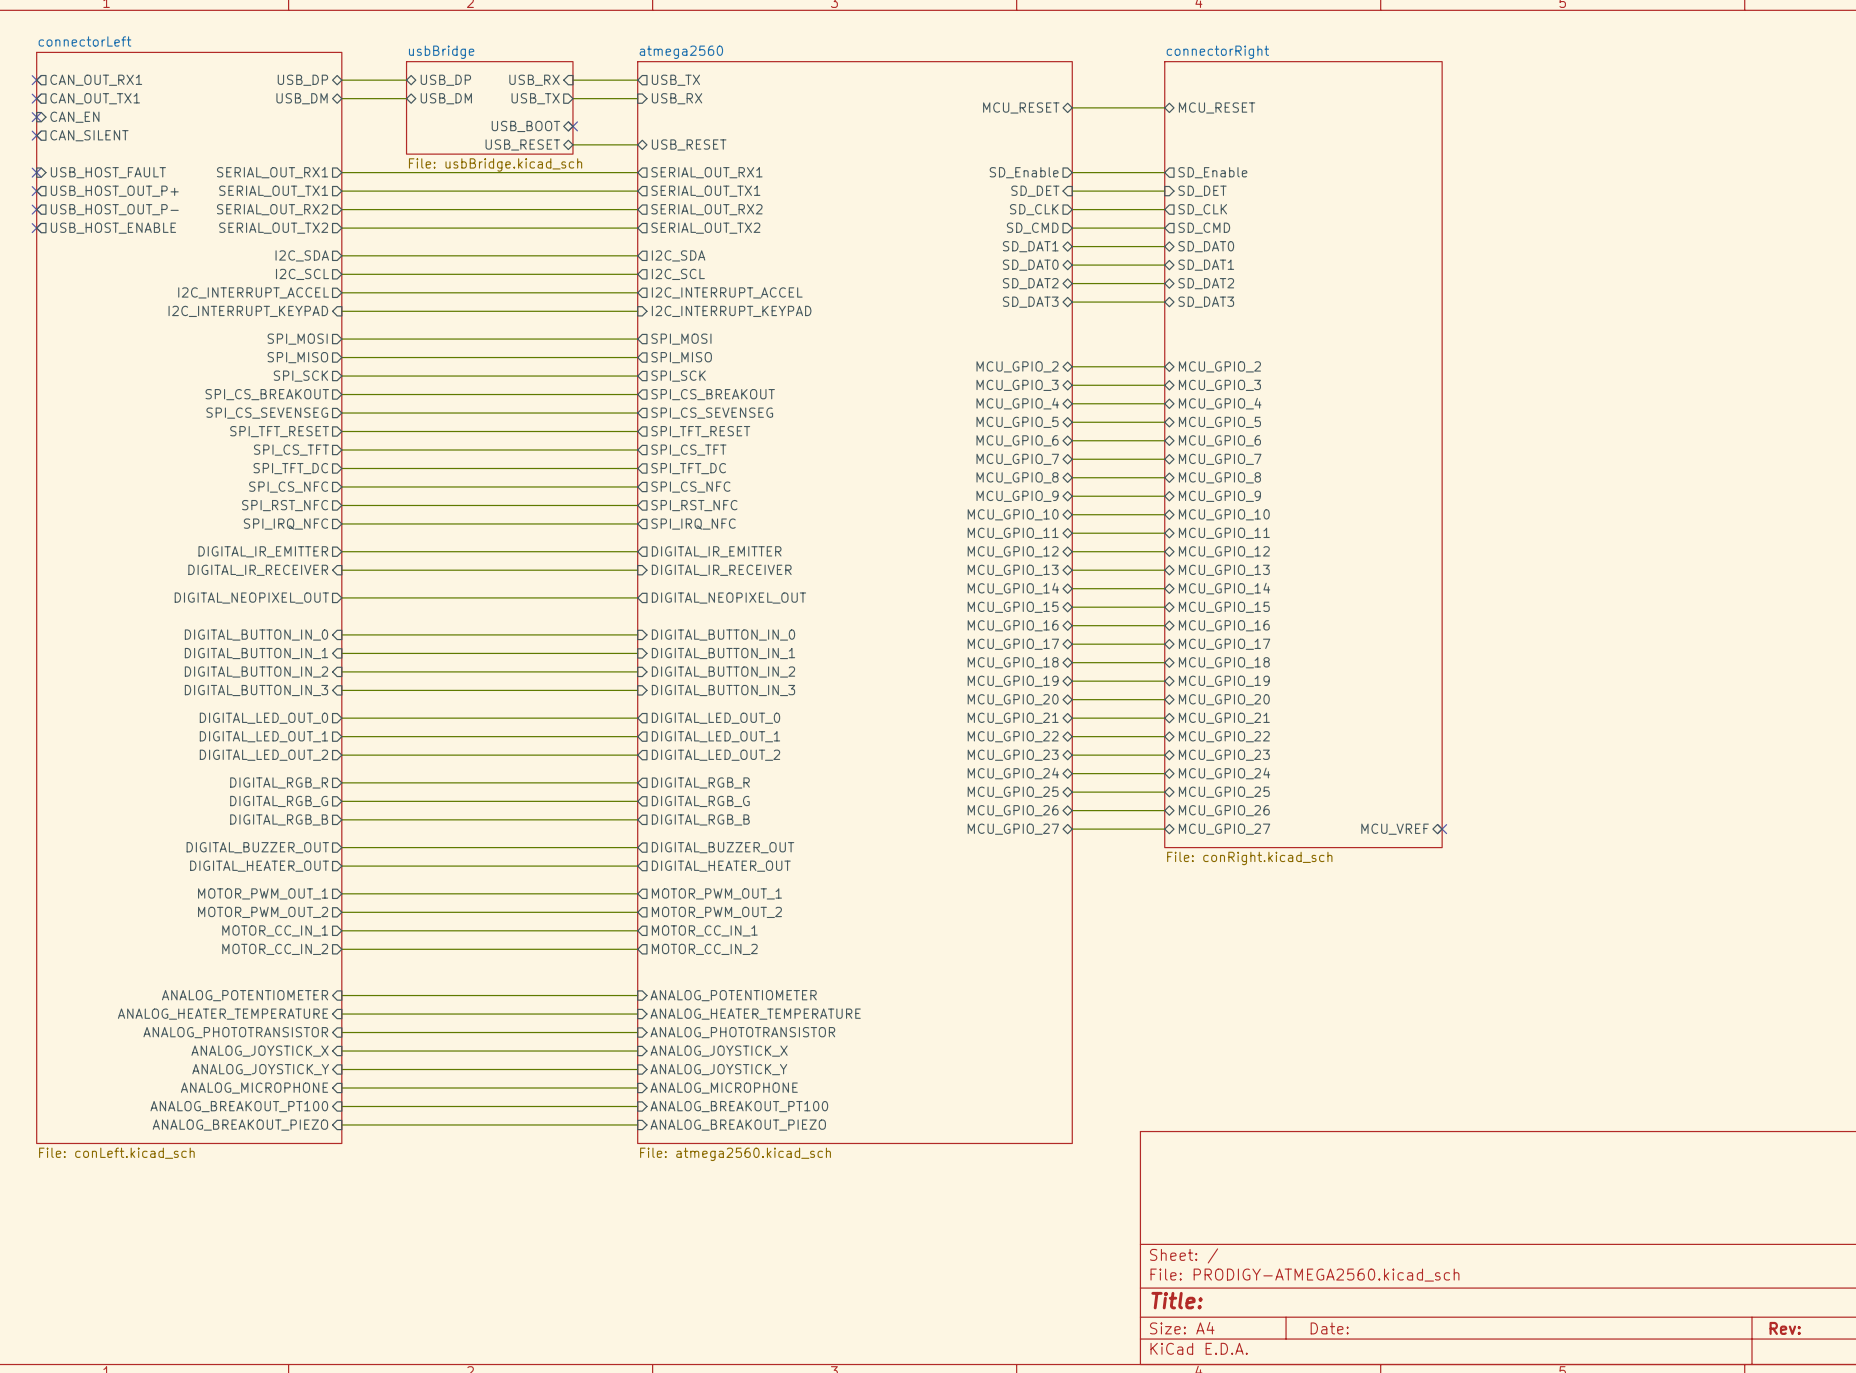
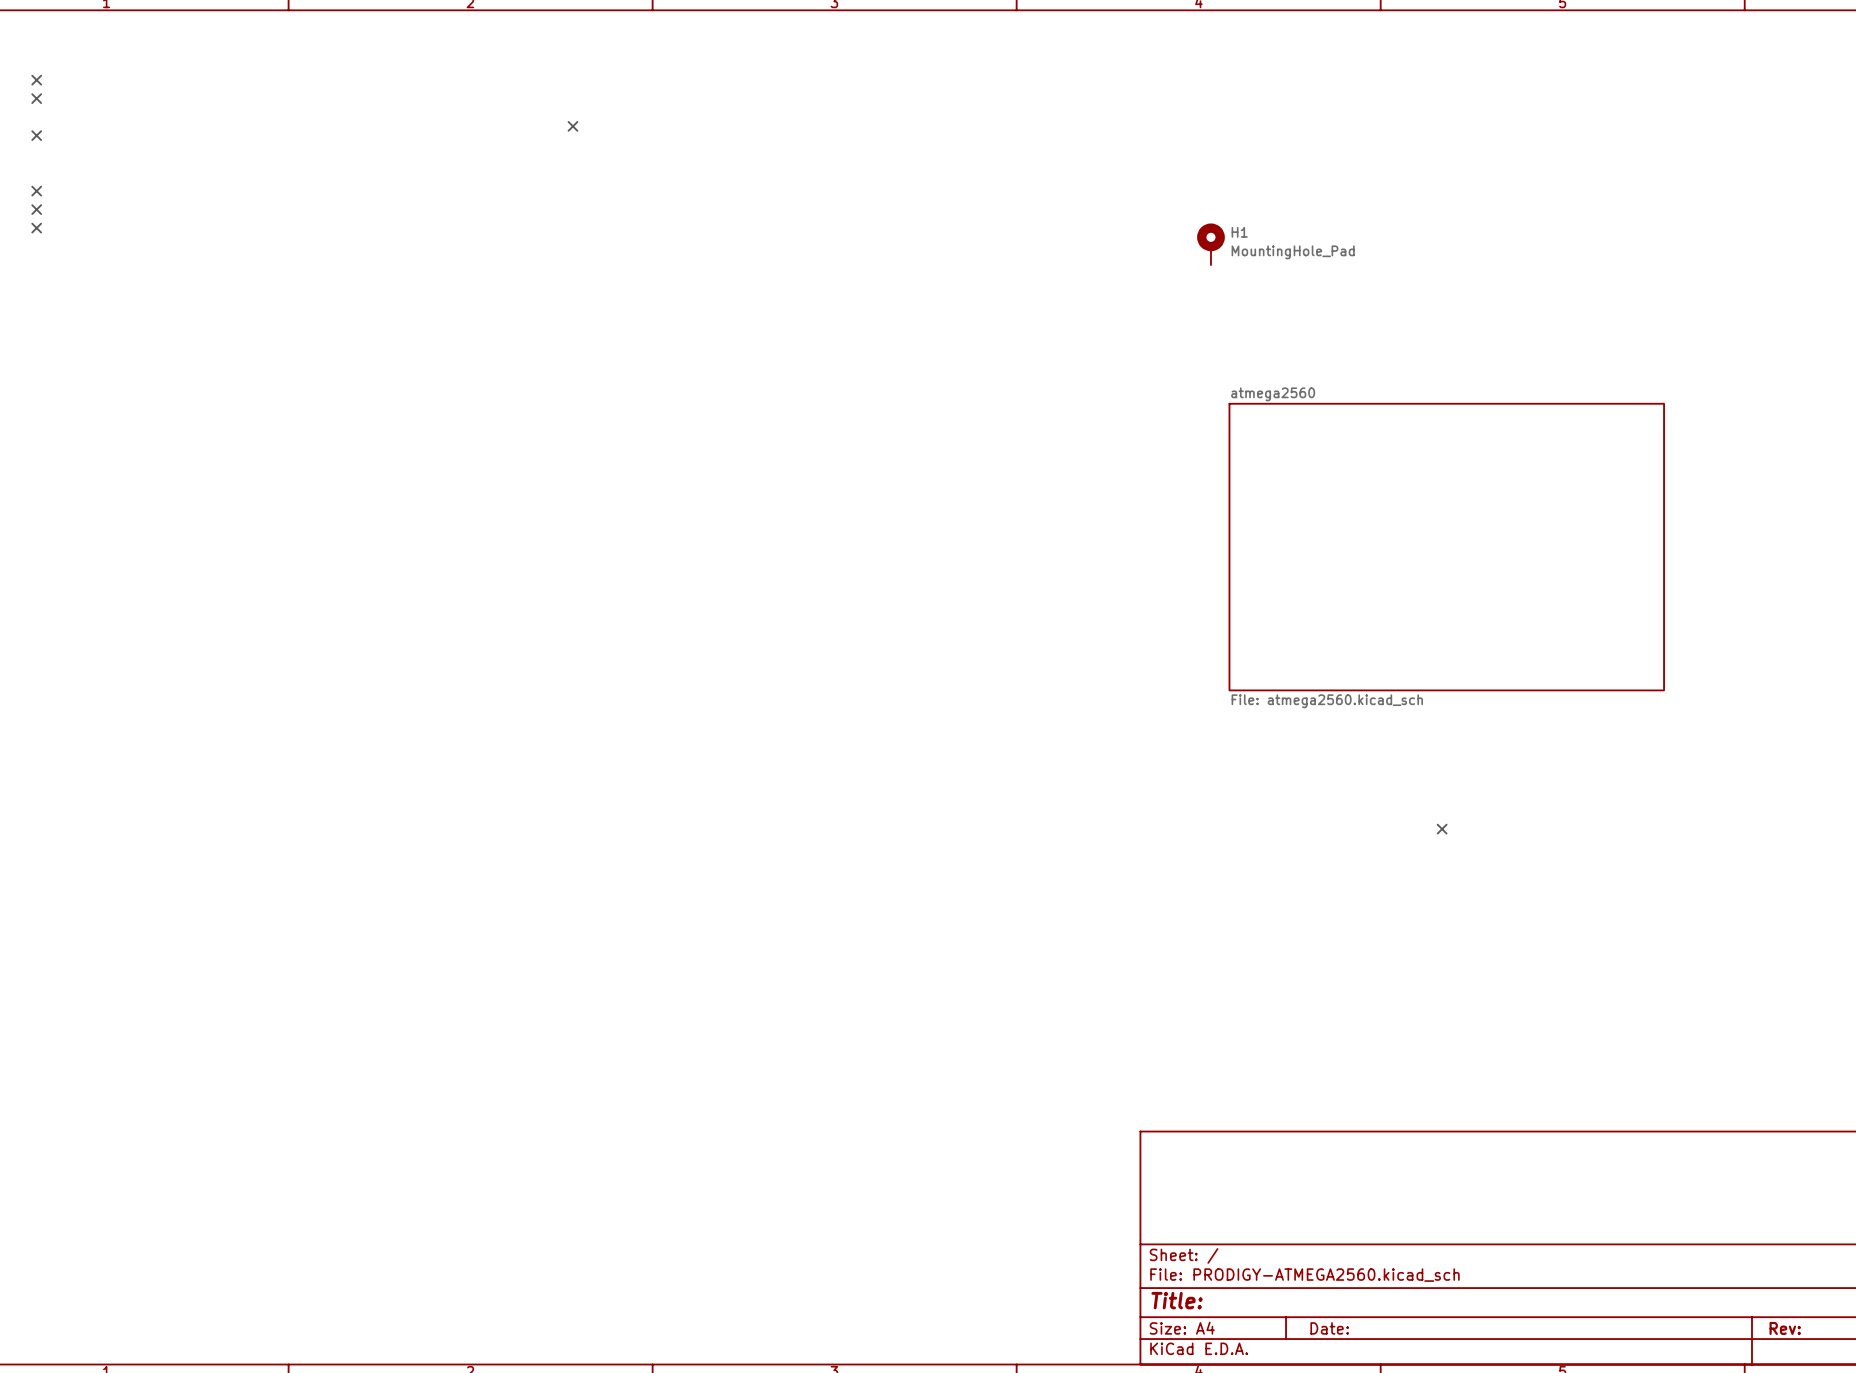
sheet atmega2560 name position: atmega2560 (681, 52) -> atmega2560 (1273, 394)
sheet atmega2560 shape: [637, 61, 1073, 1145] -> [1228, 403, 1665, 691]
sheet pin: CAN_OUT_RX1 (96, 80) -> none
sheet pin: USB_DP (302, 80) -> none
wire: (341, 80) (406, 80) -> none
sheet pin: USB_DP (445, 80) -> none
sheet pin: USB_RX (534, 80) -> none
wire: (572, 80) (637, 80) -> none
sheet pin: USB_TX (675, 80) -> none
sheet pin: CAN_OUT_TX1 (95, 98) -> none
sheet pin: USB_DM (302, 98) -> none
wire: (341, 98) (406, 98) -> none
sheet pin: USB_DM (446, 98) -> none
sheet pin: USB_TX (535, 98) -> none
wire: (572, 98) (637, 98) -> none
sheet pin: USB_RX (677, 98) -> none
sheet usbBridge: File: usbBridge.kicad_sch (489, 107) -> none
sheet pin: MCU_RESET (1021, 107) -> none
wire: (1072, 107) (1164, 107) -> none
sheet pin: MCU_RESET (1217, 107) -> none
no-connect mark: (36, 117) -> none
sheet pin: CAN_EN (74, 117) -> none
sheet pin: USB_BOOT (525, 126) -> none
sheet pin: CAN_SILENT (89, 135) -> none
sheet pin: USB_RESET (522, 144) -> none
wire: (572, 144) (637, 144) -> none
sheet pin: USB_RESET (689, 144) -> none
no-connect mark: (36, 172) -> none
sheet pin: USB_HOST_FAULT (108, 172) -> none
sheet pin: SERIAL_OUT_RX1 (272, 172) -> none
wire: (341, 172) (637, 172) -> none
sheet pin: SERIAL_OUT_RX1 (706, 172) -> none
sheet pin: SD_Enable (1024, 172) -> none
wire: (1072, 172) (1164, 172) -> none
sheet pin: SD_Enable (1212, 172) -> none
sheet pin: USB_HOST_OUT_P+ (114, 191) -> none
sheet pin: SERIAL_OUT_TX1 (273, 191) -> none
wire: (341, 191) (637, 191) -> none
sheet pin: SERIAL_OUT_TX1 (705, 191) -> none
sheet pin: SD_DET (1035, 191) -> none
wire: (1072, 191) (1164, 191) -> none
sheet pin: SD_DET (1202, 191) -> none
sheet pin: USB_HOST_OUT_P- (114, 209) -> none
sheet pin: SERIAL_OUT_RX2 (272, 209) -> none
wire: (341, 209) (637, 209) -> none
sheet pin: SERIAL_OUT_RX2 (706, 209) -> none
sheet pin: SD_CLK (1034, 209) -> none
wire: (1072, 209) (1164, 209) -> none
sheet pin: SD_CLK (1202, 209) -> none
sheet pin: USB_HOST_ENABLE (113, 228) -> none
sheet pin: SERIAL_OUT_TX2 (273, 228) -> none
wire: (341, 228) (637, 228) -> none
sheet pin: SERIAL_OUT_TX2 (705, 228) -> none
sheet pin: SD_CMD (1032, 228) -> none
wire: (1072, 228) (1164, 228) -> none
sheet pin: SD_CMD (1204, 228) -> none
H1: none -> MountingHole_Pad (1210, 244)
sheet pin: SD_DAT1 (1030, 246) -> none
wire: (1072, 246) (1164, 246) -> none
sheet pin: SD_DAT0 (1206, 246) -> none
sheet pin: I2C_SDA (302, 255) -> none
wire: (341, 255) (637, 255) -> none
sheet pin: I2C_SDA (678, 255) -> none
sheet pin: SD_DAT0 (1030, 265) -> none
wire: (1072, 265) (1164, 265) -> none
sheet pin: SD_DAT1 (1206, 265) -> none
sheet pin: I2C_SCL (302, 274) -> none
wire: (341, 274) (637, 274) -> none
sheet pin: I2C_SCL (678, 274) -> none
sheet pin: SD_DAT2 (1030, 283) -> none
wire: (1072, 283) (1164, 283) -> none
sheet pin: SD_DAT2 (1206, 283) -> none
sheet pin: I2C_INTERRUPT_ACCEL (253, 292) -> none
wire: (341, 292) (637, 292) -> none
sheet pin: I2C_INTERRUPT_ACCEL (727, 292) -> none
sheet pin: SD_DAT3 (1030, 302) -> none
wire: (1072, 302) (1164, 302) -> none
sheet pin: SD_DAT3 (1206, 302) -> none
sheet pin: I2C_INTERRUPT_KEYPAD (248, 311) -> none
wire: (341, 311) (637, 311) -> none
sheet pin: I2C_INTERRUPT_KEYPAD (731, 311) -> none
sheet pin: SPI_MOSI (297, 339) -> none
wire: (341, 339) (637, 339) -> none
sheet pin: SPI_MOSI (681, 339) -> none
sheet pin: SPI_MISO (297, 357) -> none
wire: (341, 357) (637, 357) -> none
sheet pin: SPI_MISO (681, 357) -> none
sheet pin: MCU_GPIO_2 (1017, 366) -> none
wire: (1072, 366) (1164, 366) -> none
sheet pin: MCU_GPIO_2 (1219, 366) -> none
sheet pin: SPI_SCK (300, 376) -> none
wire: (341, 376) (637, 376) -> none
sheet pin: SPI_SCK (678, 376) -> none
sheet pin: MCU_GPIO_3 (1017, 385) -> none
wire: (1072, 385) (1164, 385) -> none
sheet pin: MCU_GPIO_3 (1219, 385) -> none
sheet pin: SPI_CS_BREAKOUT (267, 394) -> none
wire: (341, 394) (637, 394) -> none
sheet pin: SPI_CS_BREAKOUT (713, 394) -> none
sheet pin: MCU_GPIO_4 (1017, 403) -> none
wire: (1072, 403) (1164, 403) -> none
sheet pin: MCU_GPIO_4 (1220, 403) -> none
sheet pin: SPI_CS_SEVENSEG (267, 413) -> none
wire: (341, 413) (637, 413) -> none
sheet pin: SPI_CS_SEVENSEG (712, 413) -> none
sheet pin: MCU_GPIO_5 (1017, 422) -> none
wire: (1072, 422) (1164, 422) -> none
sheet pin: MCU_GPIO_5 (1219, 422) -> none
sheet pin: SPI_TFT_RESET (279, 431) -> none
wire: (341, 431) (637, 431) -> none
sheet pin: SPI_TFT_RESET (700, 431) -> none
sheet pin: MCU_GPIO_6 (1017, 440) -> none
wire: (1072, 440) (1164, 440) -> none
sheet pin: MCU_GPIO_6 (1219, 440) -> none
sheet pin: SPI_CS_TFT (291, 450) -> none
wire: (341, 450) (637, 450) -> none
sheet pin: SPI_CS_TFT (688, 450) -> none
sheet connectorRight: File: conRight.kicad_sch (1303, 454) -> none
sheet pin: MCU_GPIO_7 (1017, 459) -> none
wire: (1072, 459) (1164, 459) -> none
sheet pin: MCU_GPIO_7 (1220, 459) -> none
sheet pin: SPI_TFT_DC (290, 468) -> none
wire: (341, 468) (637, 468) -> none
sheet pin: SPI_TFT_DC (688, 468) -> none
sheet pin: MCU_GPIO_8 (1017, 477) -> none
wire: (1072, 477) (1164, 477) -> none
sheet pin: MCU_GPIO_8 (1219, 477) -> none
wire: (341, 486) (637, 486) -> none
sheet pin: SPI_CS_NFC (288, 487) -> none
sheet pin: SPI_CS_NFC (690, 487) -> none
sheet pin: MCU_GPIO_9 (1017, 496) -> none
wire: (1072, 496) (1164, 496) -> none
sheet pin: MCU_GPIO_9 (1219, 496) -> none
sheet pin: SPI_RST_NFC (285, 505) -> none
wire: (341, 505) (637, 505) -> none
sheet pin: SPI_RST_NFC (694, 505) -> none
sheet pin: MCU_GPIO_10 (1013, 514) -> none
wire: (1072, 514) (1164, 514) -> none
sheet pin: MCU_GPIO_10 (1224, 514) -> none
wire: (341, 523) (637, 523) -> none
sheet pin: SPI_IRQ_NFC (285, 524) -> none
sheet pin: SPI_IRQ_NFC (693, 524) -> none
sheet pin: MCU_GPIO_11 (1013, 533) -> none
wire: (1072, 533) (1164, 533) -> none
sheet pin: MCU_GPIO_11 (1224, 533) -> none
sheet pin: DIGITAL_IR_EMITTER (263, 551) -> none
wire: (341, 551) (637, 551) -> none
sheet pin: DIGITAL_IR_EMITTER (716, 551) -> none
sheet pin: MCU_GPIO_12 (1013, 551) -> none
wire: (1072, 551) (1164, 551) -> none
sheet pin: MCU_GPIO_12 (1224, 551) -> none
sheet pin: DIGITAL_IR_RECEIVER (258, 570) -> none
wire: (341, 570) (637, 570) -> none
sheet pin: DIGITAL_IR_RECEIVER (721, 570) -> none
sheet pin: MCU_GPIO_13 (1013, 570) -> none
wire: (1072, 570) (1164, 570) -> none
sheet pin: MCU_GPIO_13 (1224, 570) -> none
sheet pin: MCU_GPIO_14 (1013, 588) -> none
wire: (1072, 588) (1164, 588) -> none
sheet pin: MCU_GPIO_14 (1224, 588) -> none
sheet connectorLeft: File: conLeft.kicad_sch (189, 597) -> none
wire: (341, 597) (637, 597) -> none
sheet pin: DIGITAL_NEOPIXEL_OUT (251, 598) -> none
sheet pin: DIGITAL_NEOPIXEL_OUT (728, 598) -> none
sheet pin: MCU_GPIO_15 (1013, 607) -> none
wire: (1072, 607) (1164, 607) -> none
sheet pin: MCU_GPIO_15 (1224, 607) -> none
sheet pin: MCU_GPIO_16 (1013, 625) -> none
wire: (1072, 625) (1164, 625) -> none
sheet pin: MCU_GPIO_16 (1224, 625) -> none
wire: (341, 634) (637, 634) -> none
sheet pin: DIGITAL_BUTTON_IN_0 (256, 635) -> none
sheet pin: DIGITAL_BUTTON_IN_0 (723, 635) -> none
sheet pin: MCU_GPIO_17 (1013, 644) -> none
wire: (1072, 644) (1164, 644) -> none
sheet pin: MCU_GPIO_17 (1224, 644) -> none
sheet pin: DIGITAL_BUTTON_IN_1 (256, 653) -> none
wire: (341, 653) (637, 653) -> none
sheet pin: DIGITAL_BUTTON_IN_1 (723, 653) -> none
sheet pin: MCU_GPIO_18 (1013, 662) -> none
wire: (1072, 662) (1164, 662) -> none
sheet pin: MCU_GPIO_18 (1224, 662) -> none
wire: (341, 671) (637, 671) -> none
sheet pin: DIGITAL_BUTTON_IN_2 (256, 672) -> none
sheet pin: DIGITAL_BUTTON_IN_2 (723, 672) -> none
sheet pin: MCU_GPIO_19 (1013, 681) -> none
wire: (1072, 681) (1164, 681) -> none
sheet pin: MCU_GPIO_19 (1224, 681) -> none
sheet pin: DIGITAL_BUTTON_IN_3 (256, 690) -> none
wire: (341, 690) (637, 690) -> none
sheet pin: DIGITAL_BUTTON_IN_3 (723, 690) -> none
sheet pin: MCU_GPIO_20 (1013, 699) -> none
wire: (1072, 699) (1164, 699) -> none
sheet pin: MCU_GPIO_20 (1224, 699) -> none
sheet pin: DIGITAL_LED_OUT_0 (263, 718) -> none
wire: (341, 718) (637, 718) -> none
sheet pin: DIGITAL_LED_OUT_0 (716, 718) -> none
sheet pin: MCU_GPIO_21 (1013, 718) -> none
wire: (1072, 718) (1164, 718) -> none
sheet pin: MCU_GPIO_21 (1224, 718) -> none
sheet pin: DIGITAL_LED_OUT_1 (263, 736) -> none
wire: (341, 736) (637, 736) -> none
sheet pin: DIGITAL_LED_OUT_1 (716, 736) -> none
sheet pin: MCU_GPIO_22 (1013, 736) -> none
wire: (1072, 736) (1164, 736) -> none
sheet pin: MCU_GPIO_22 (1224, 736) -> none
sheet pin: DIGITAL_LED_OUT_2 (263, 755) -> none
wire: (341, 755) (637, 755) -> none
sheet pin: DIGITAL_LED_OUT_2 (716, 755) -> none
sheet pin: MCU_GPIO_23 (1013, 755) -> none
wire: (1072, 755) (1164, 755) -> none
sheet pin: MCU_GPIO_23 (1224, 755) -> none
sheet pin: MCU_GPIO_24 (1013, 773) -> none
wire: (1072, 773) (1164, 773) -> none
sheet pin: MCU_GPIO_24 (1224, 773) -> none
sheet pin: DIGITAL_RGB_R (279, 782) -> none
wire: (341, 782) (637, 782) -> none
sheet pin: DIGITAL_RGB_R (700, 782) -> none
sheet pin: MCU_GPIO_25 (1013, 792) -> none
wire: (1072, 792) (1164, 792) -> none
sheet pin: MCU_GPIO_25 (1224, 792) -> none
sheet pin: DIGITAL_RGB_G (279, 801) -> none
wire: (341, 801) (637, 801) -> none
sheet pin: DIGITAL_RGB_G (700, 801) -> none
sheet pin: MCU_GPIO_26 (1013, 810) -> none
wire: (1072, 810) (1164, 810) -> none
sheet pin: MCU_GPIO_26 (1224, 810) -> none
sheet pin: DIGITAL_RGB_B (279, 819) -> none
wire: (341, 819) (637, 819) -> none
sheet pin: DIGITAL_RGB_B (700, 819) -> none
sheet pin: MCU_GPIO_27 (1013, 829) -> none
wire: (1072, 829) (1164, 829) -> none
sheet pin: MCU_GPIO_27 (1224, 829) -> none
sheet pin: MCU_VREF (1395, 829) -> none
sheet pin: DIGITAL_BUZZER_OUT (257, 847) -> none
wire: (341, 847) (637, 847) -> none
sheet pin: DIGITAL_BUZZER_OUT (723, 847) -> none
sheet pin: DIGITAL_HEATER_OUT (259, 866) -> none
wire: (341, 866) (637, 866) -> none
sheet pin: DIGITAL_HEATER_OUT (721, 866) -> none
sheet pin: MOTOR_PWM_OUT_1 (263, 893) -> none
wire: (341, 893) (637, 893) -> none
sheet pin: MOTOR_PWM_OUT_1 (716, 893) -> none
sheet pin: MOTOR_PWM_OUT_2 (263, 912) -> none
wire: (341, 912) (637, 912) -> none
sheet pin: MOTOR_PWM_OUT_2 (716, 912) -> none
sheet pin: MOTOR_CC_IN_1 (275, 930) -> none
wire: (341, 930) (637, 930) -> none
sheet pin: MOTOR_CC_IN_1 (704, 930) -> none
sheet pin: MOTOR_CC_IN_2 (275, 949) -> none
wire: (341, 949) (637, 949) -> none
sheet pin: MOTOR_CC_IN_2 (704, 949) -> none
sheet pin: ANALOG_POTENTIOMETER (245, 995) -> none
wire: (341, 995) (637, 995) -> none
sheet pin: ANALOG_POTENTIOMETER (733, 995) -> none
sheet pin: ANALOG_HEATER_TEMPERATURE (223, 1014) -> none
wire: (341, 1014) (637, 1014) -> none
sheet pin: ANALOG_HEATER_TEMPERATURE (755, 1014) -> none
sheet pin: ANALOG_PHOTOTRANSISTOR (235, 1032) -> none
wire: (341, 1032) (637, 1032) -> none
sheet pin: ANALOG_PHOTOTRANSISTOR (742, 1032) -> none
sheet pin: ANALOG_JOYSTICK_X (259, 1051) -> none
wire: (341, 1051) (637, 1051) -> none
sheet pin: ANALOG_JOYSTICK_X (719, 1051) -> none
sheet pin: ANALOG_JOYSTICK_Y (260, 1069) -> none
wire: (341, 1069) (637, 1069) -> none
sheet pin: ANALOG_JOYSTICK_Y (718, 1069) -> none
wire: (341, 1087) (637, 1087) -> none
sheet pin: ANALOG_MICROPHONE (254, 1088) -> none
sheet pin: ANALOG_MICROPHONE (724, 1088) -> none
sheet pin: ANALOG_BREAKOUT_PT100 (239, 1106) -> none
wire: (341, 1106) (637, 1106) -> none
sheet pin: ANALOG_BREAKOUT_PT100 (739, 1106) -> none
wire: (341, 1124) (637, 1124) -> none
sheet pin: ANALOG_BREAKOUT_PIEZO (240, 1125) -> none
sheet pin: ANALOG_BREAKOUT_PIEZO (738, 1125) -> none
sheet atmega2560 value position: File: atmega2560.kicad_sch (735, 1154) -> File: atmega2560.kicad_sch (1327, 701)

